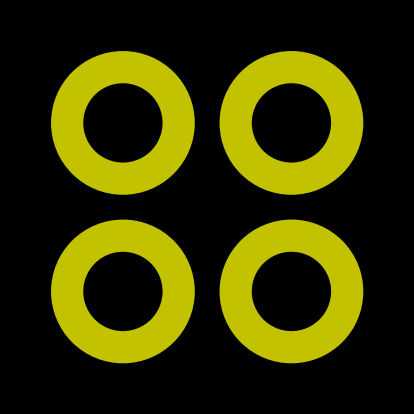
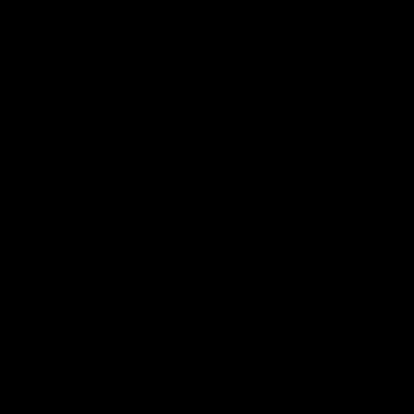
part: (122, 122) -> none
part: (291, 122) -> none
part: (122, 291) -> none
part: (291, 291) -> none

